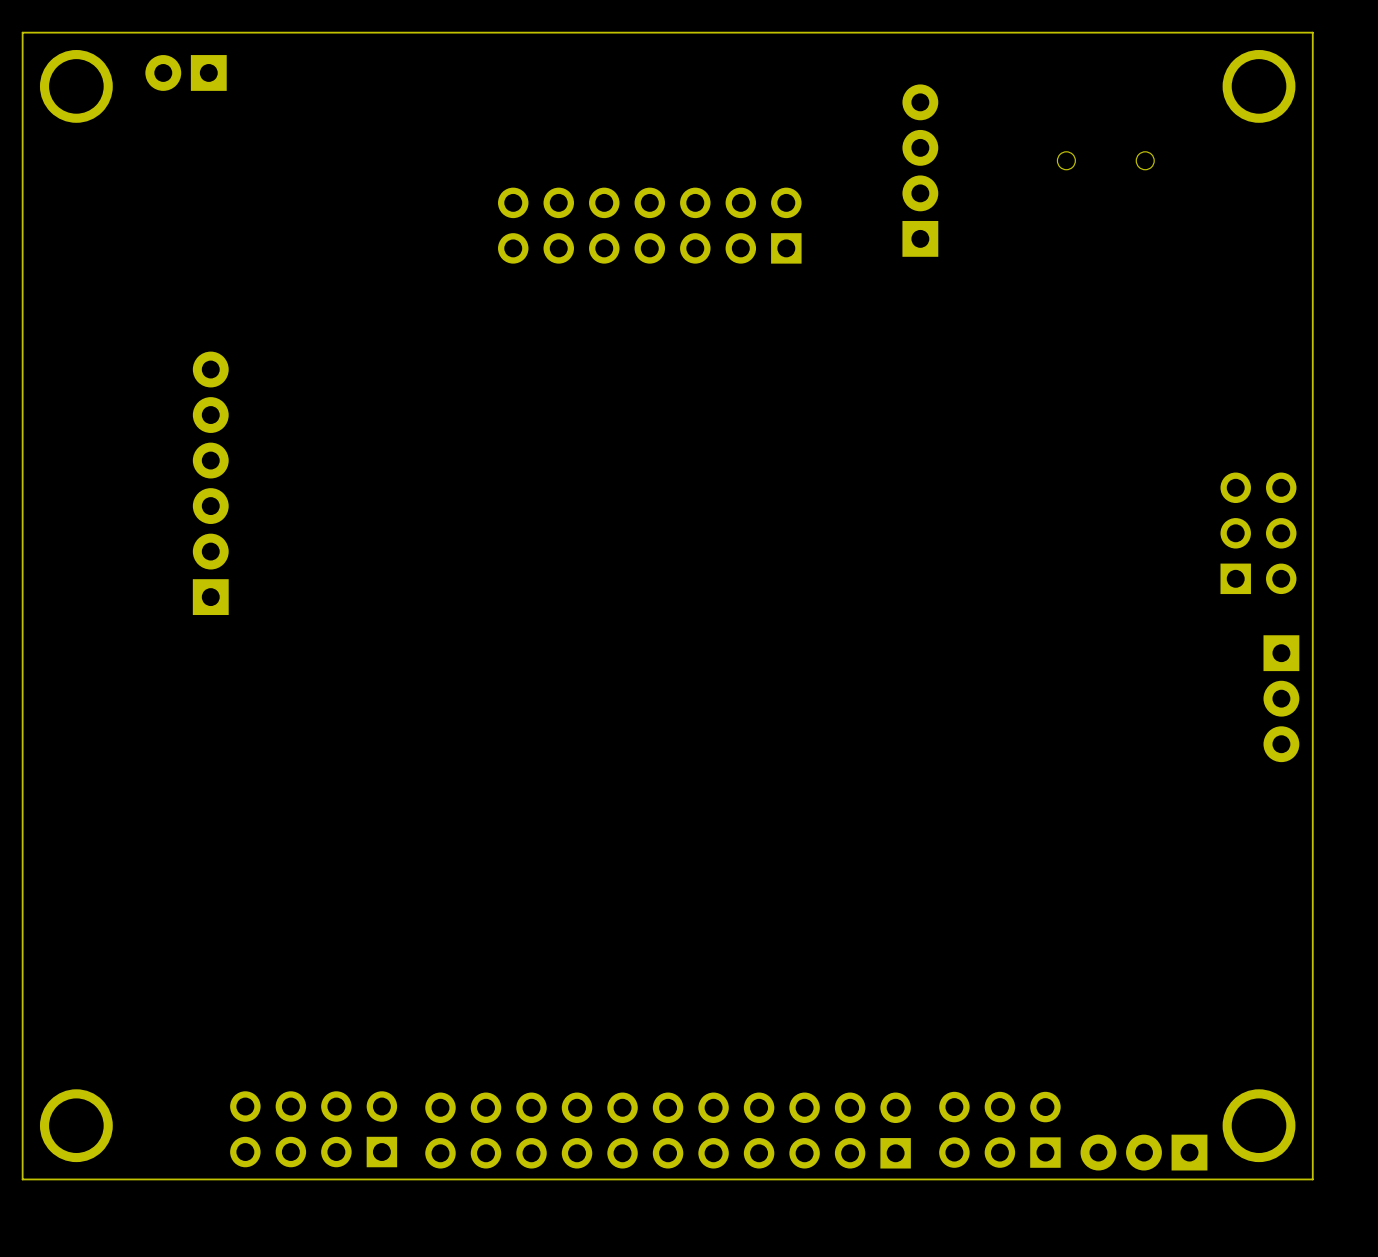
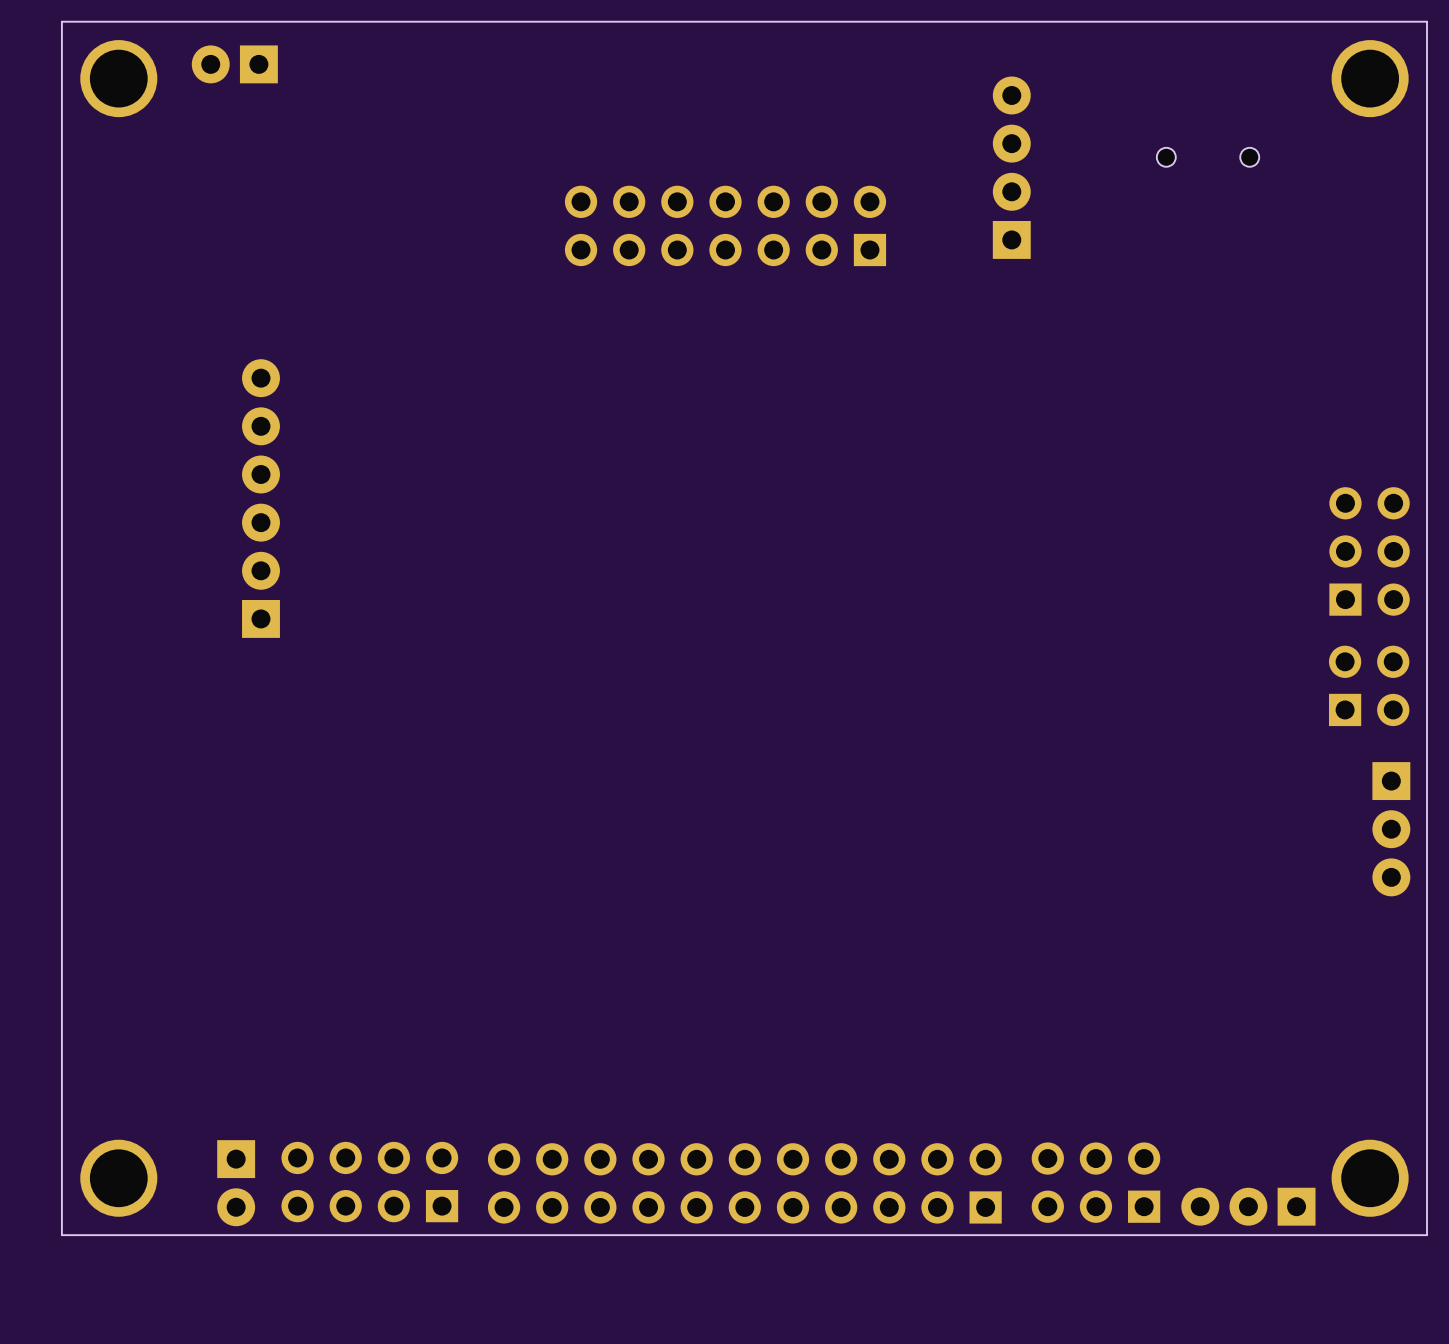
part: none -> (1369, 685)
part position: (1281, 698) -> (1391, 829)
part: none -> (236, 1183)

